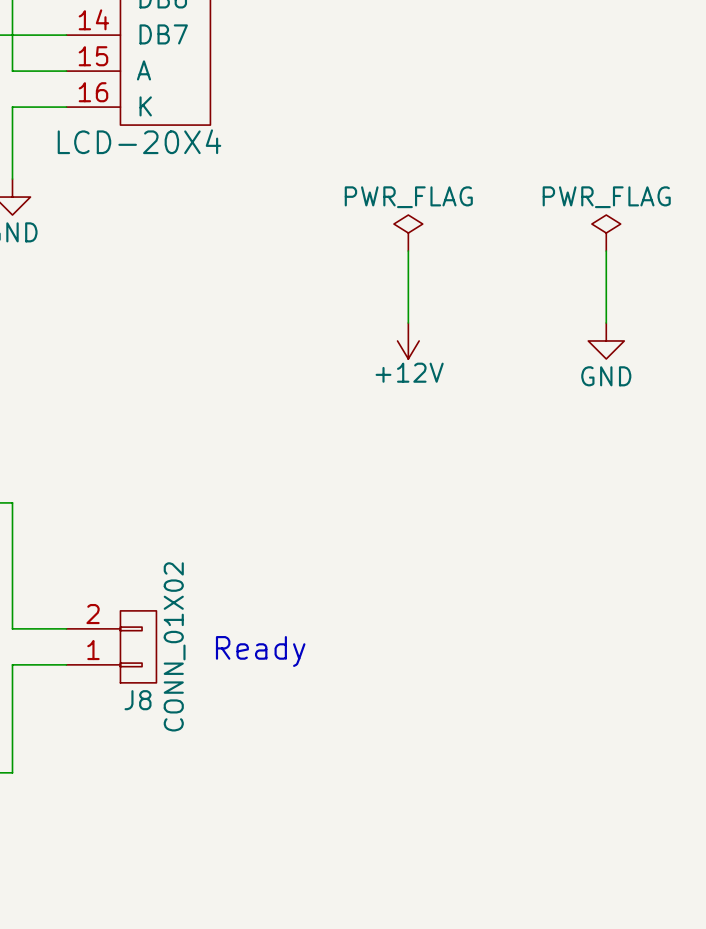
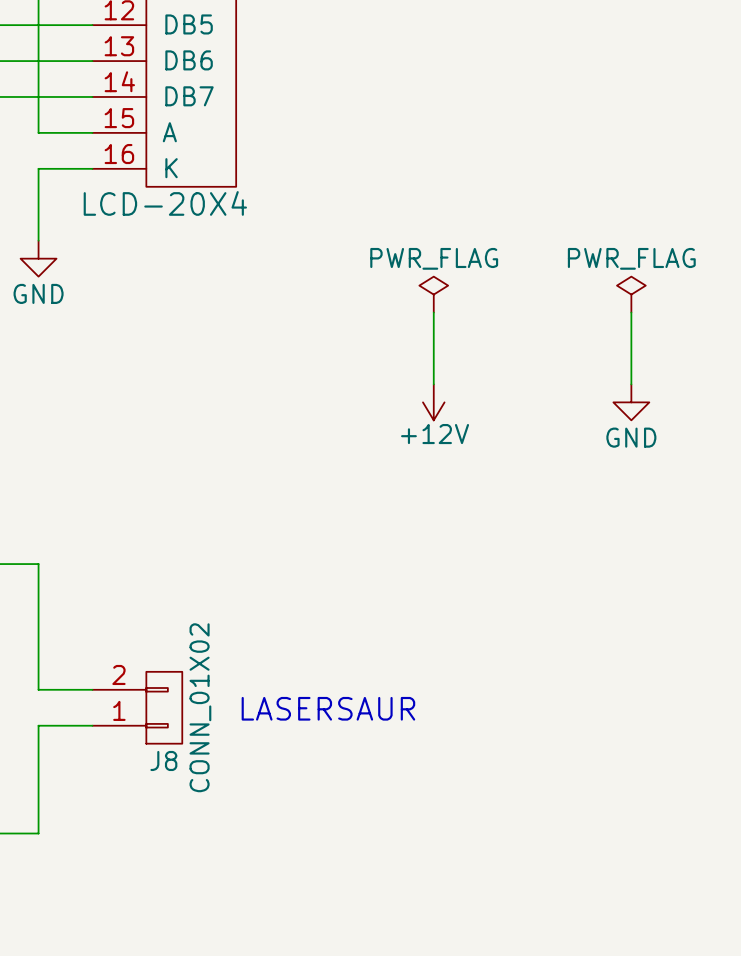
text: Ready (260, 651) -> LASERSAUR (328, 708)

